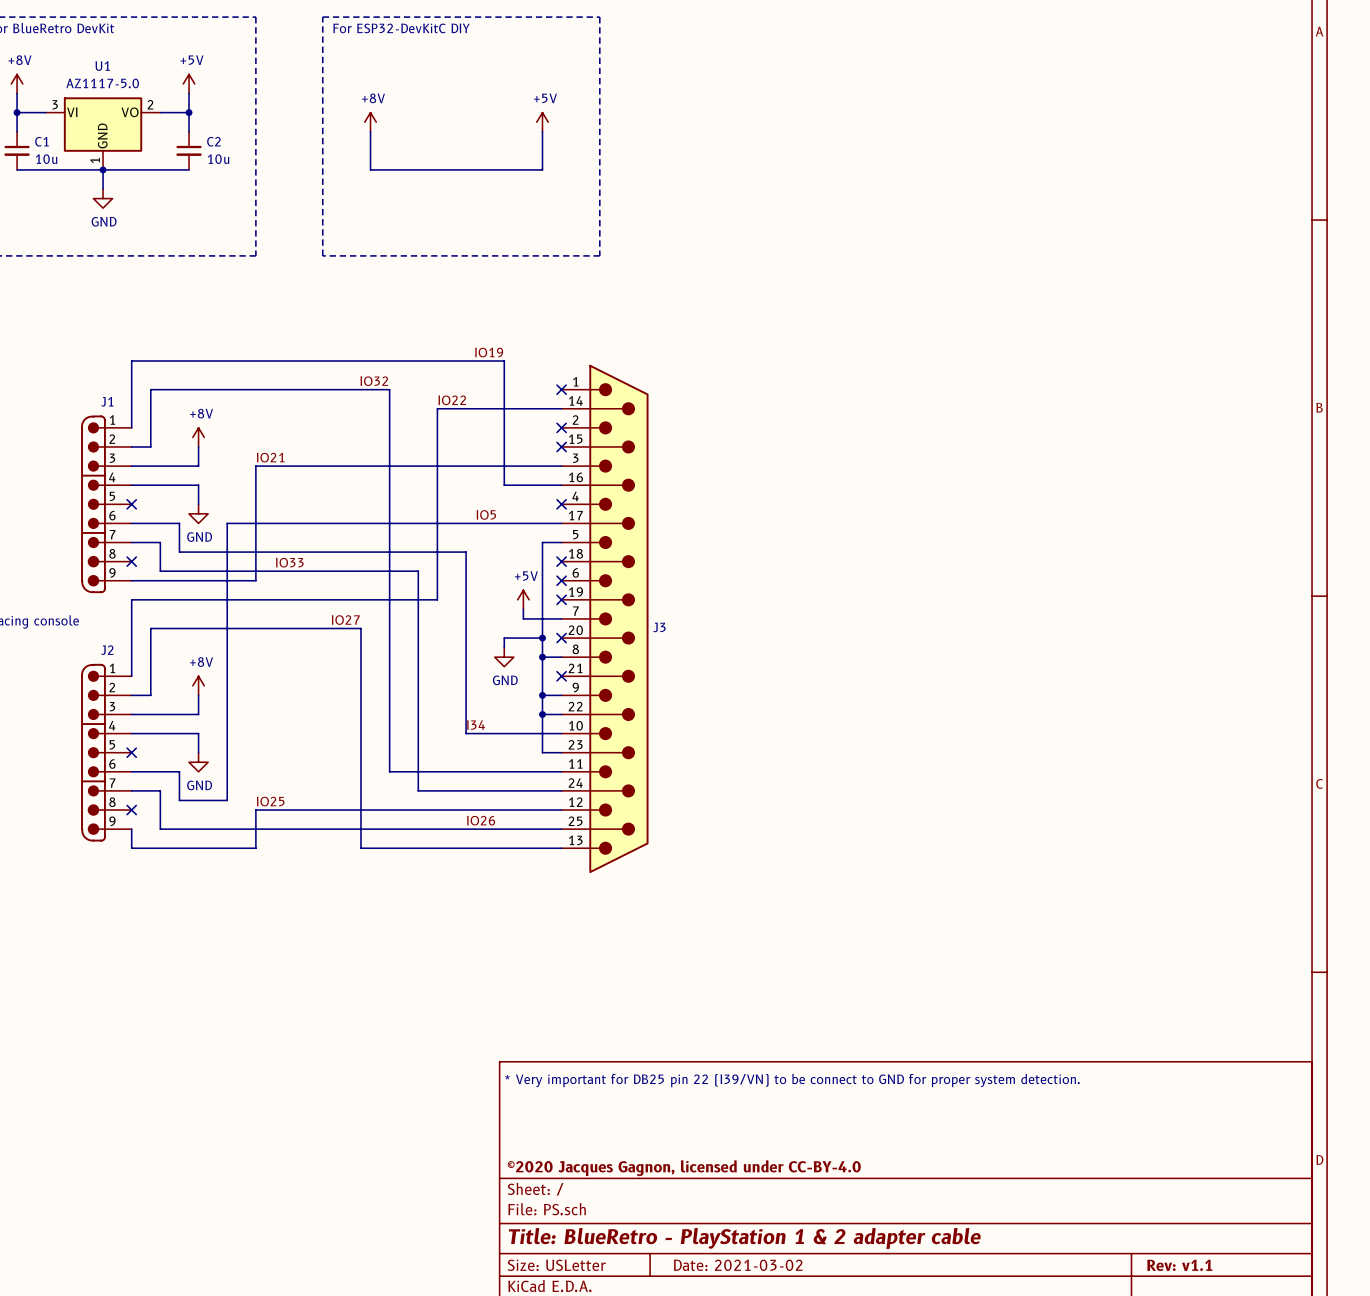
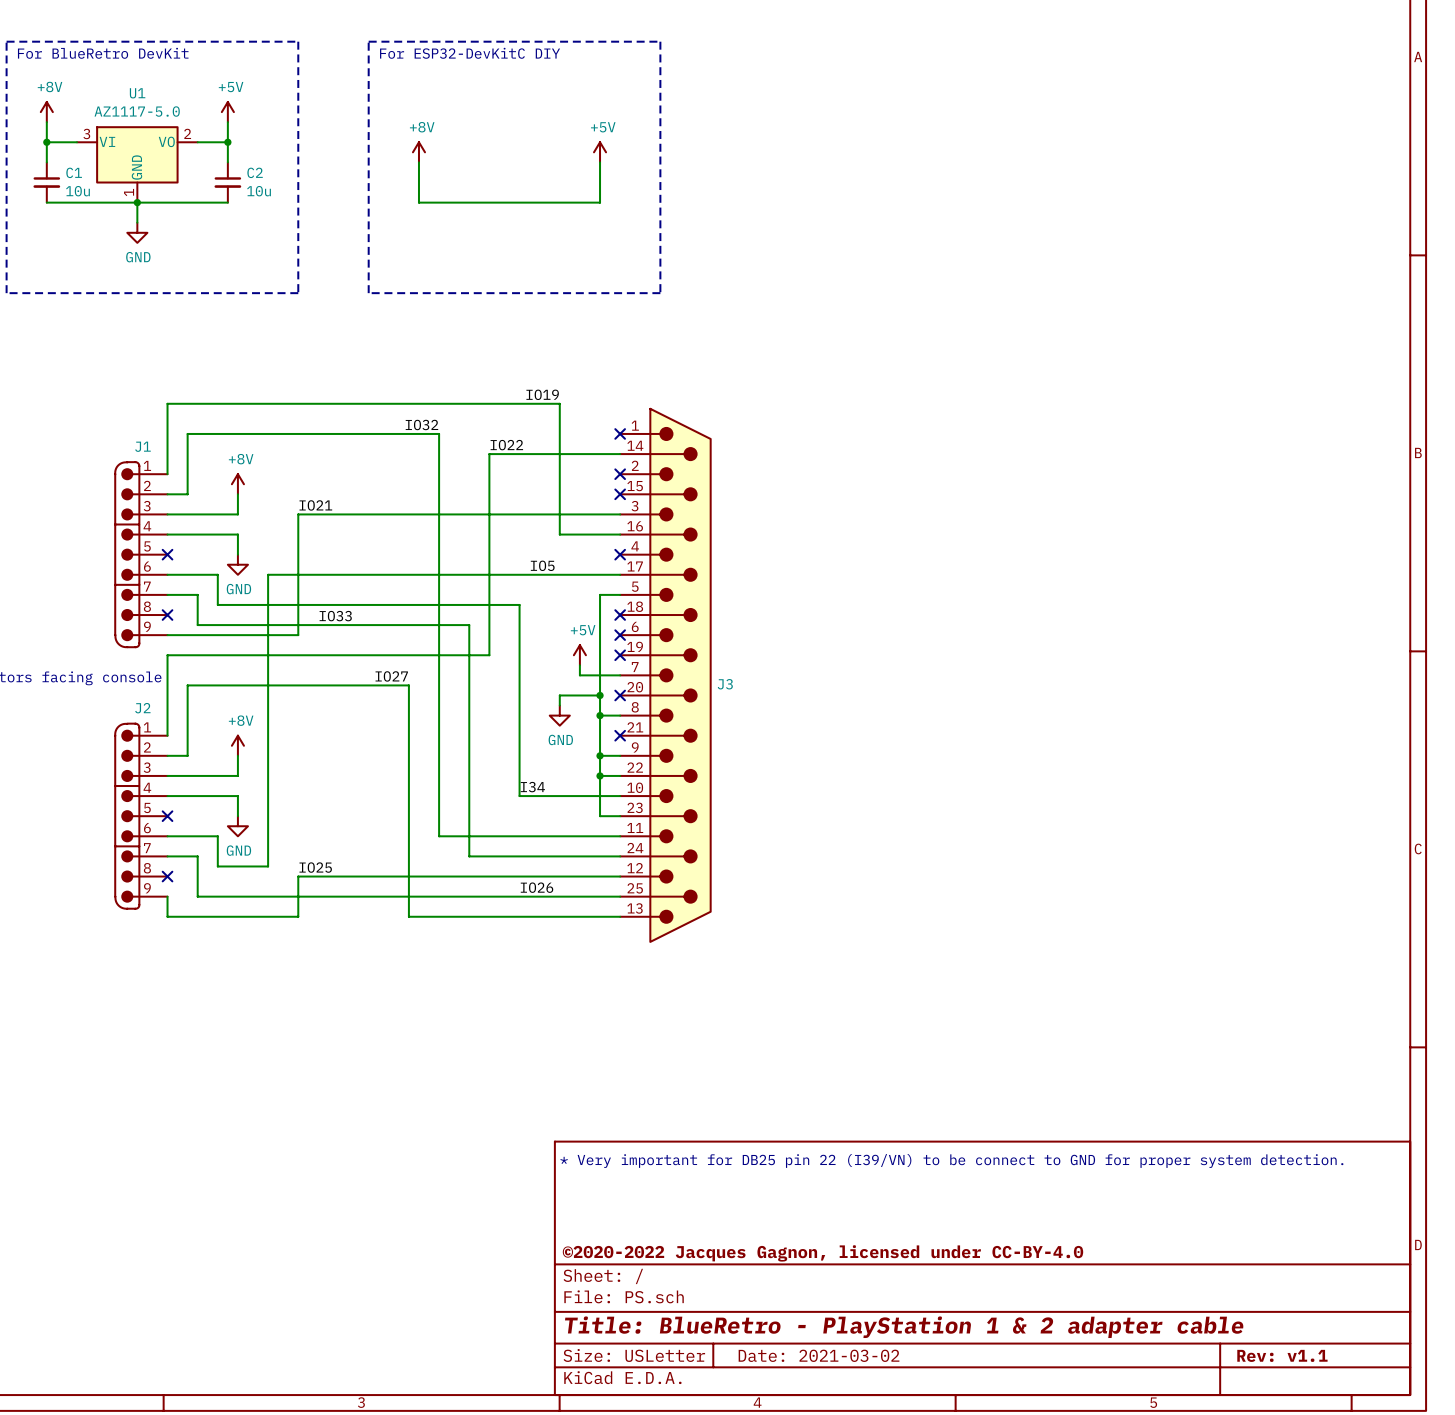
title block: ©2020 Jacques Gagnon, licensed under CC-BY-4.0 (684, 1168) -> ©2020-2022 Jacques Gagnon, licensed under CC-BY-4.0 (822, 1253)

